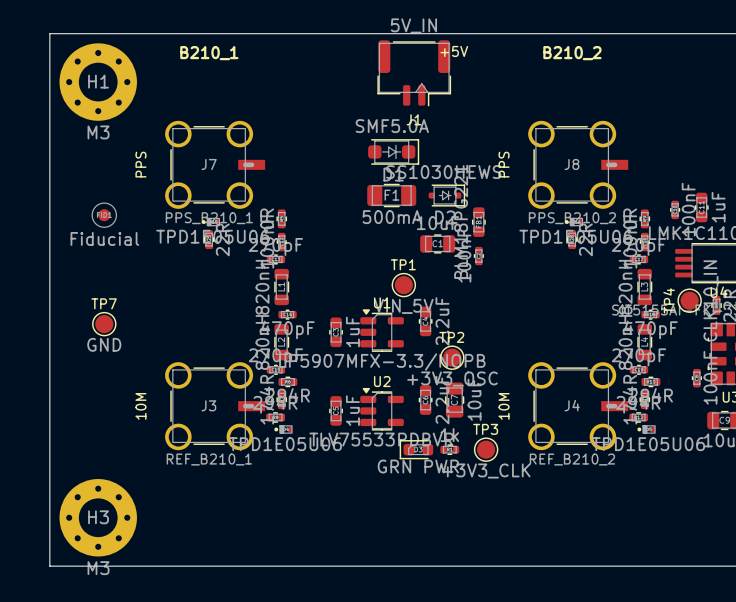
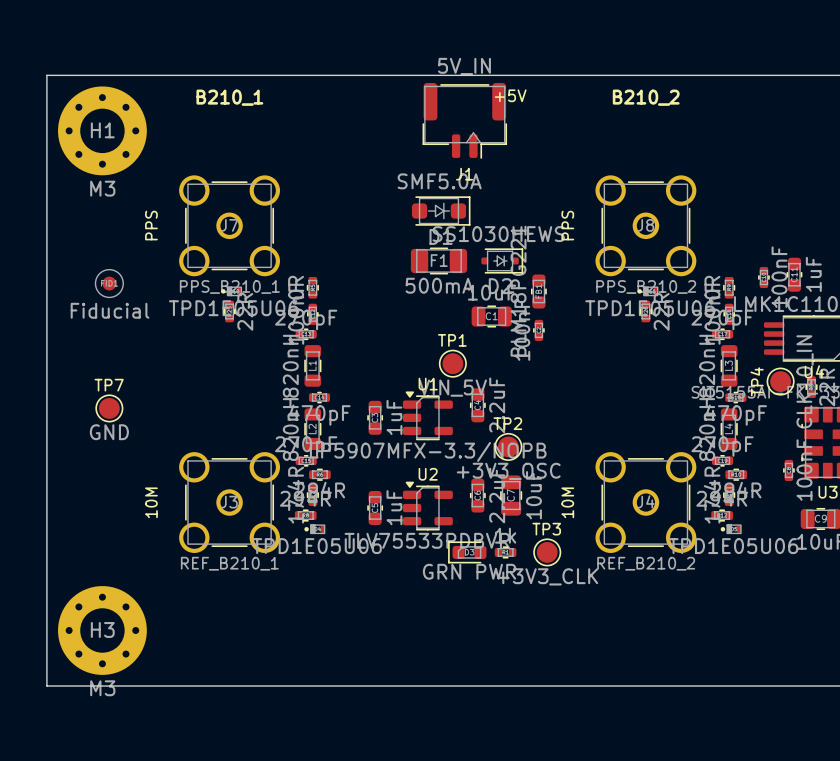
J7 footprint: [165, 120, 266, 209] -> [179, 175, 281, 277]
J8 footprint: [528, 120, 629, 209] -> [595, 175, 697, 277]
J3 footprint: [165, 362, 266, 451] -> [179, 452, 281, 553]
J4 footprint: [528, 362, 629, 451] -> [595, 452, 697, 553]

